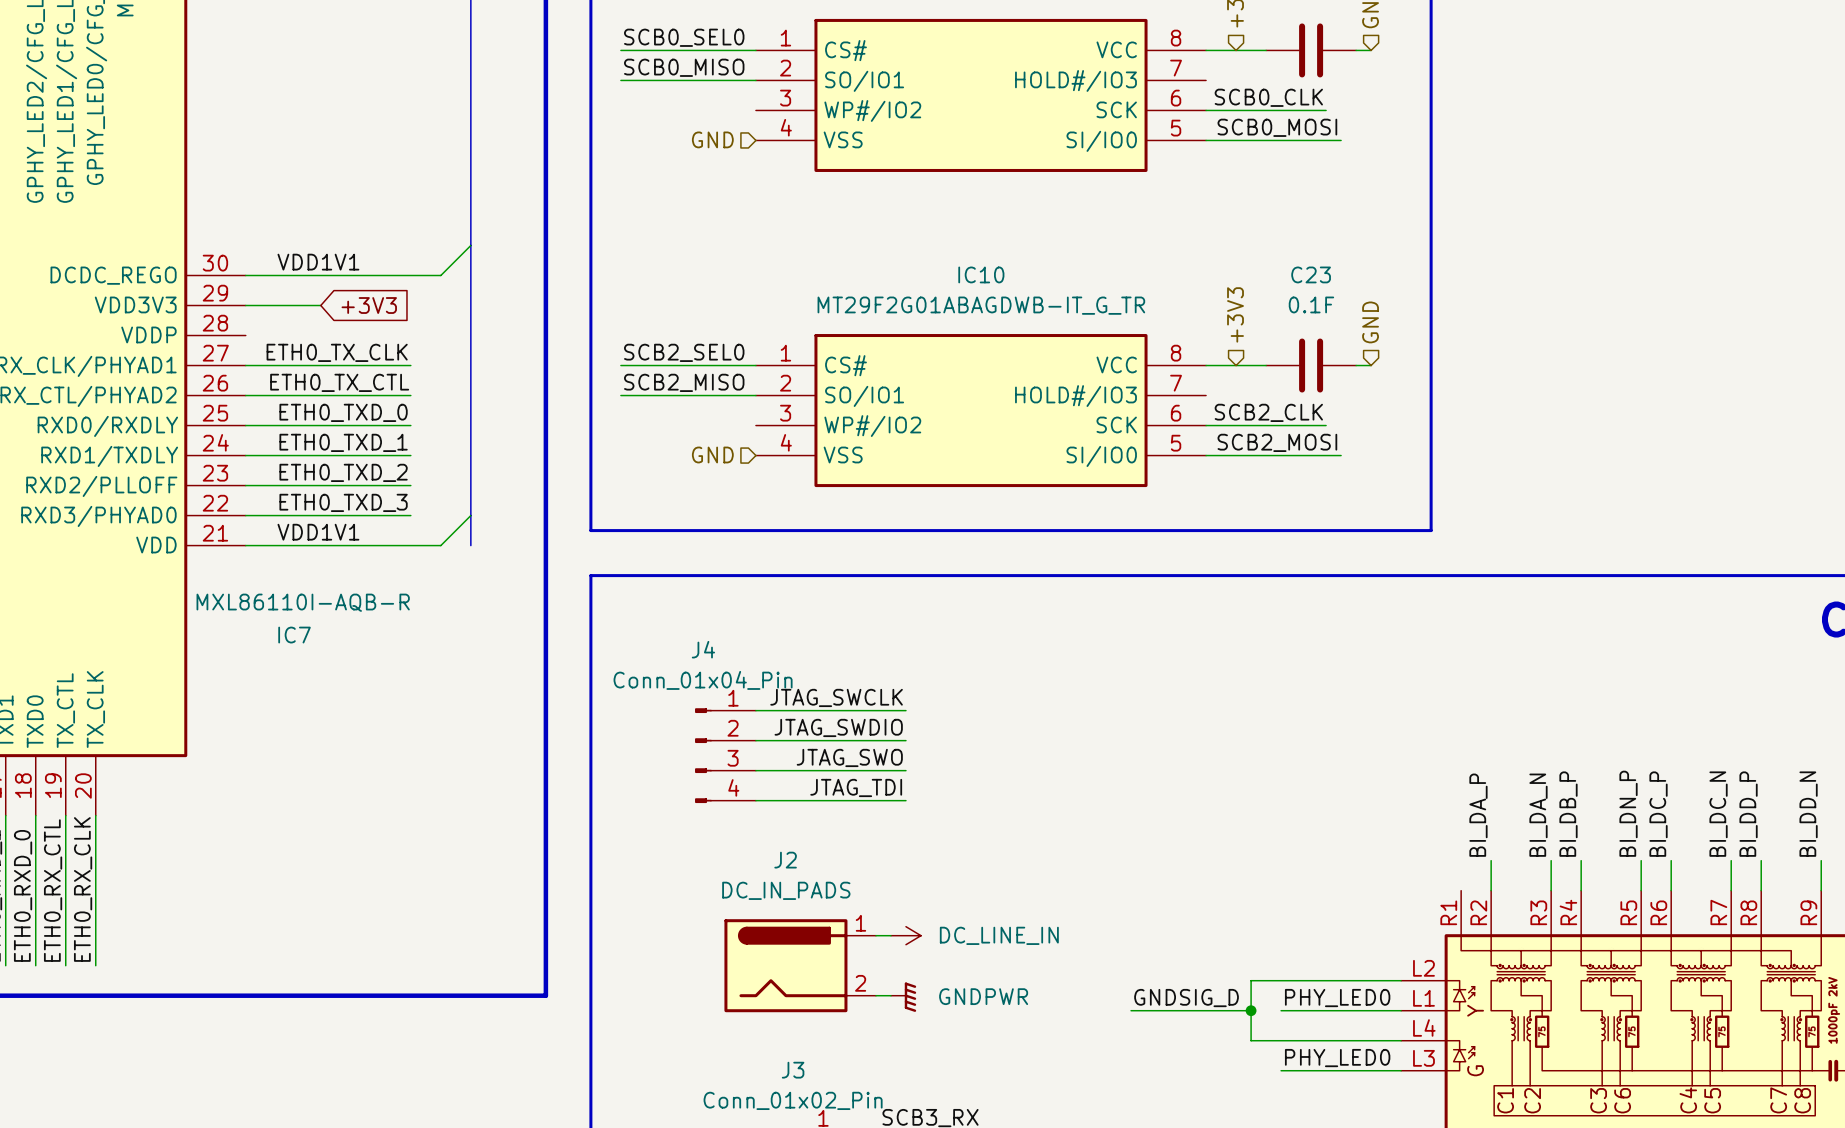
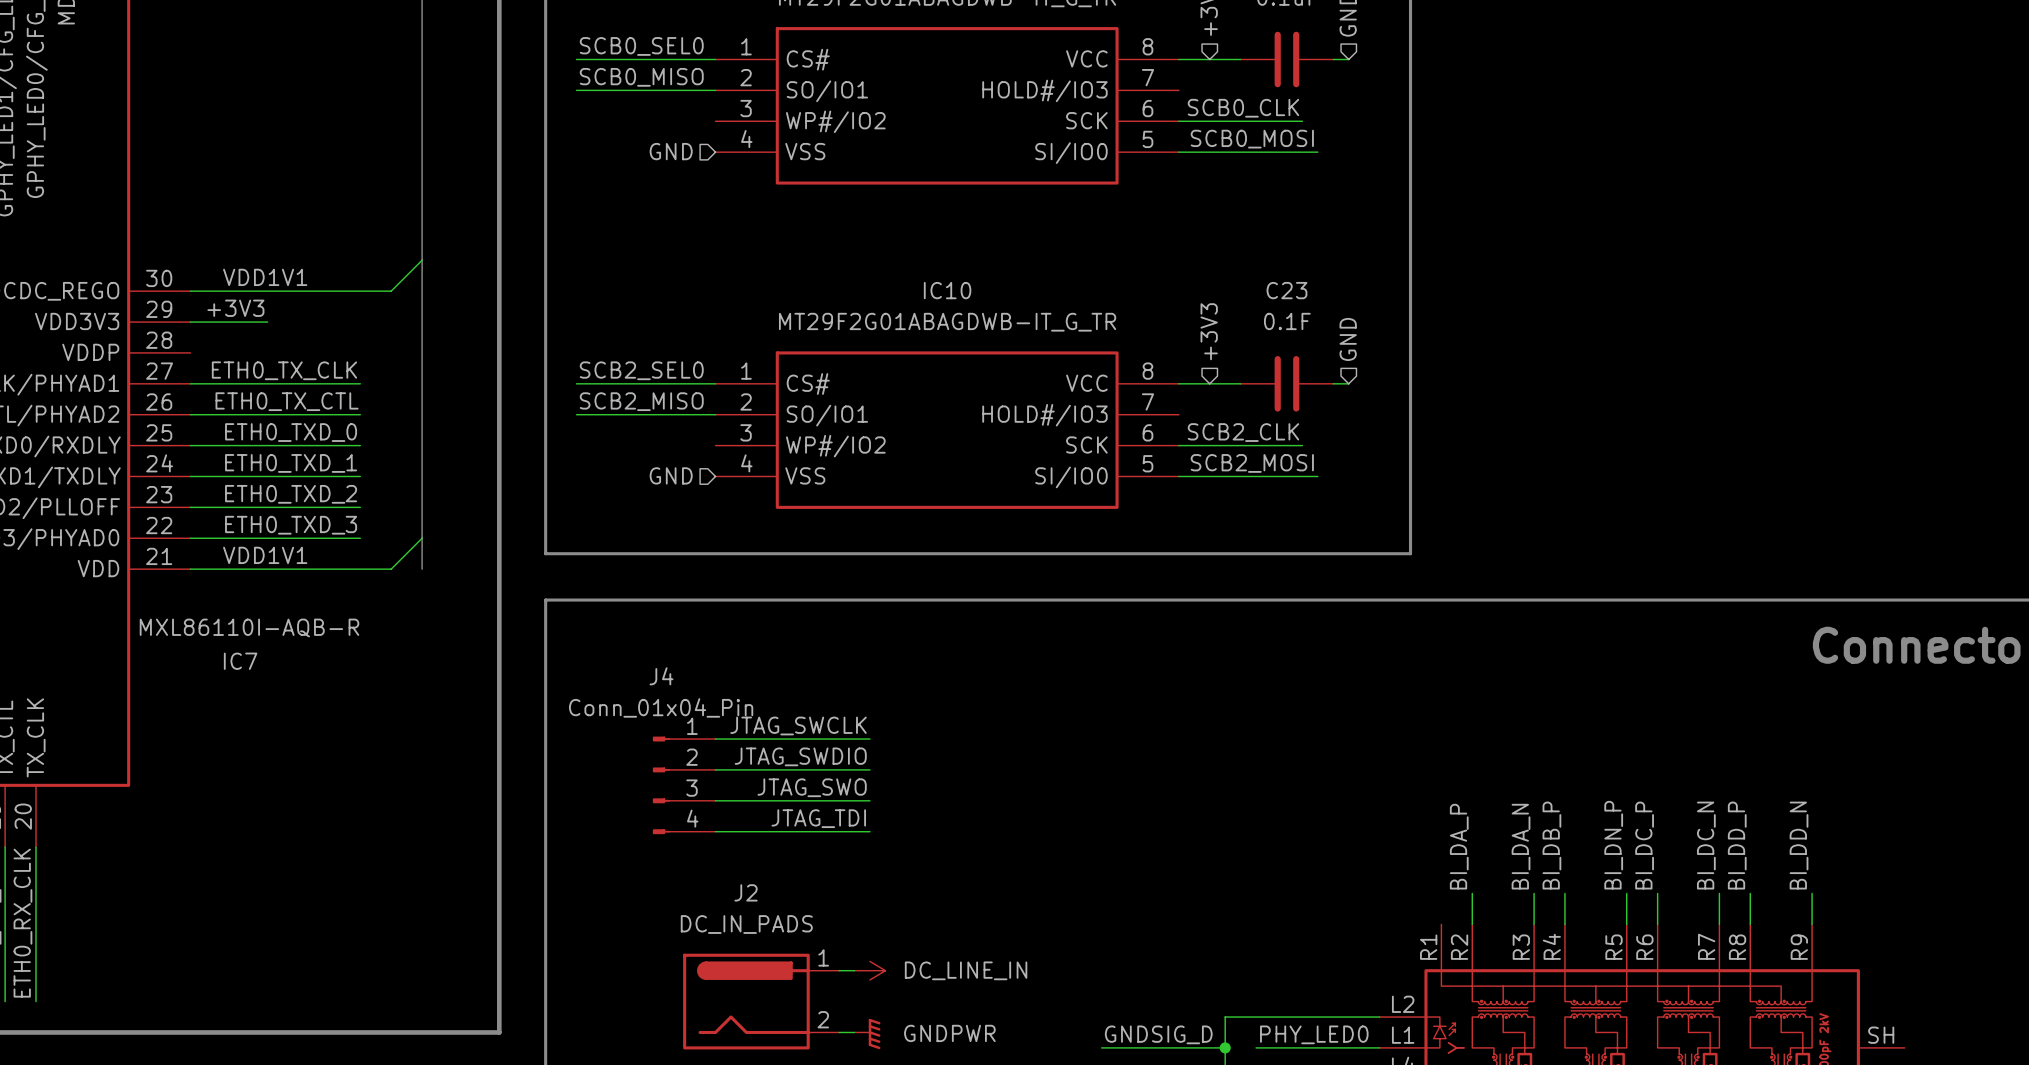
label: none -> +3V3 (235, 308)
global label: +3V3 (369, 305) -> none

